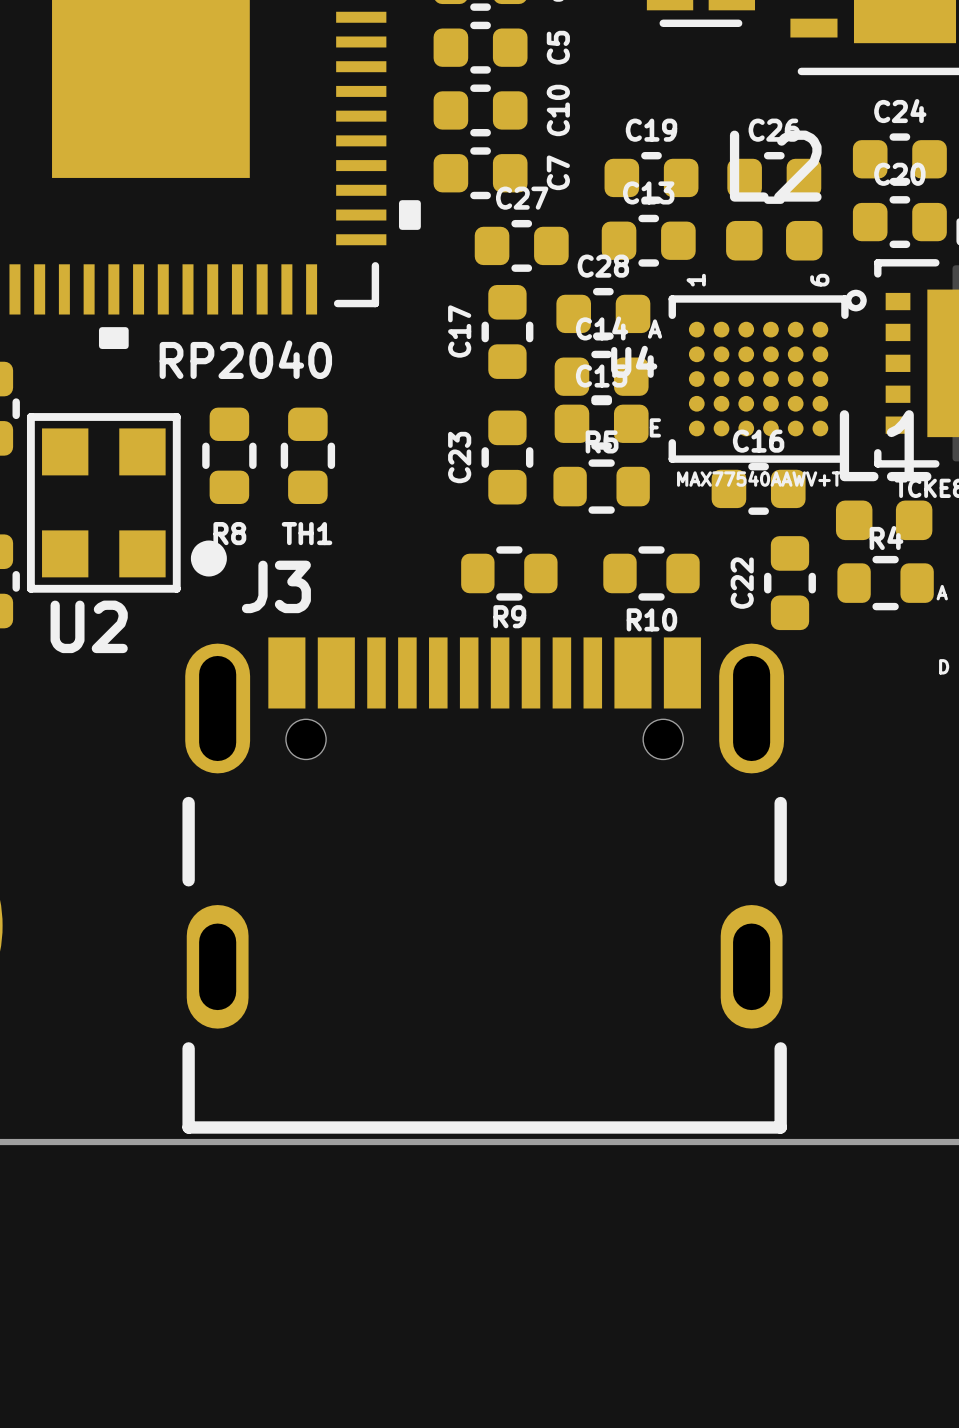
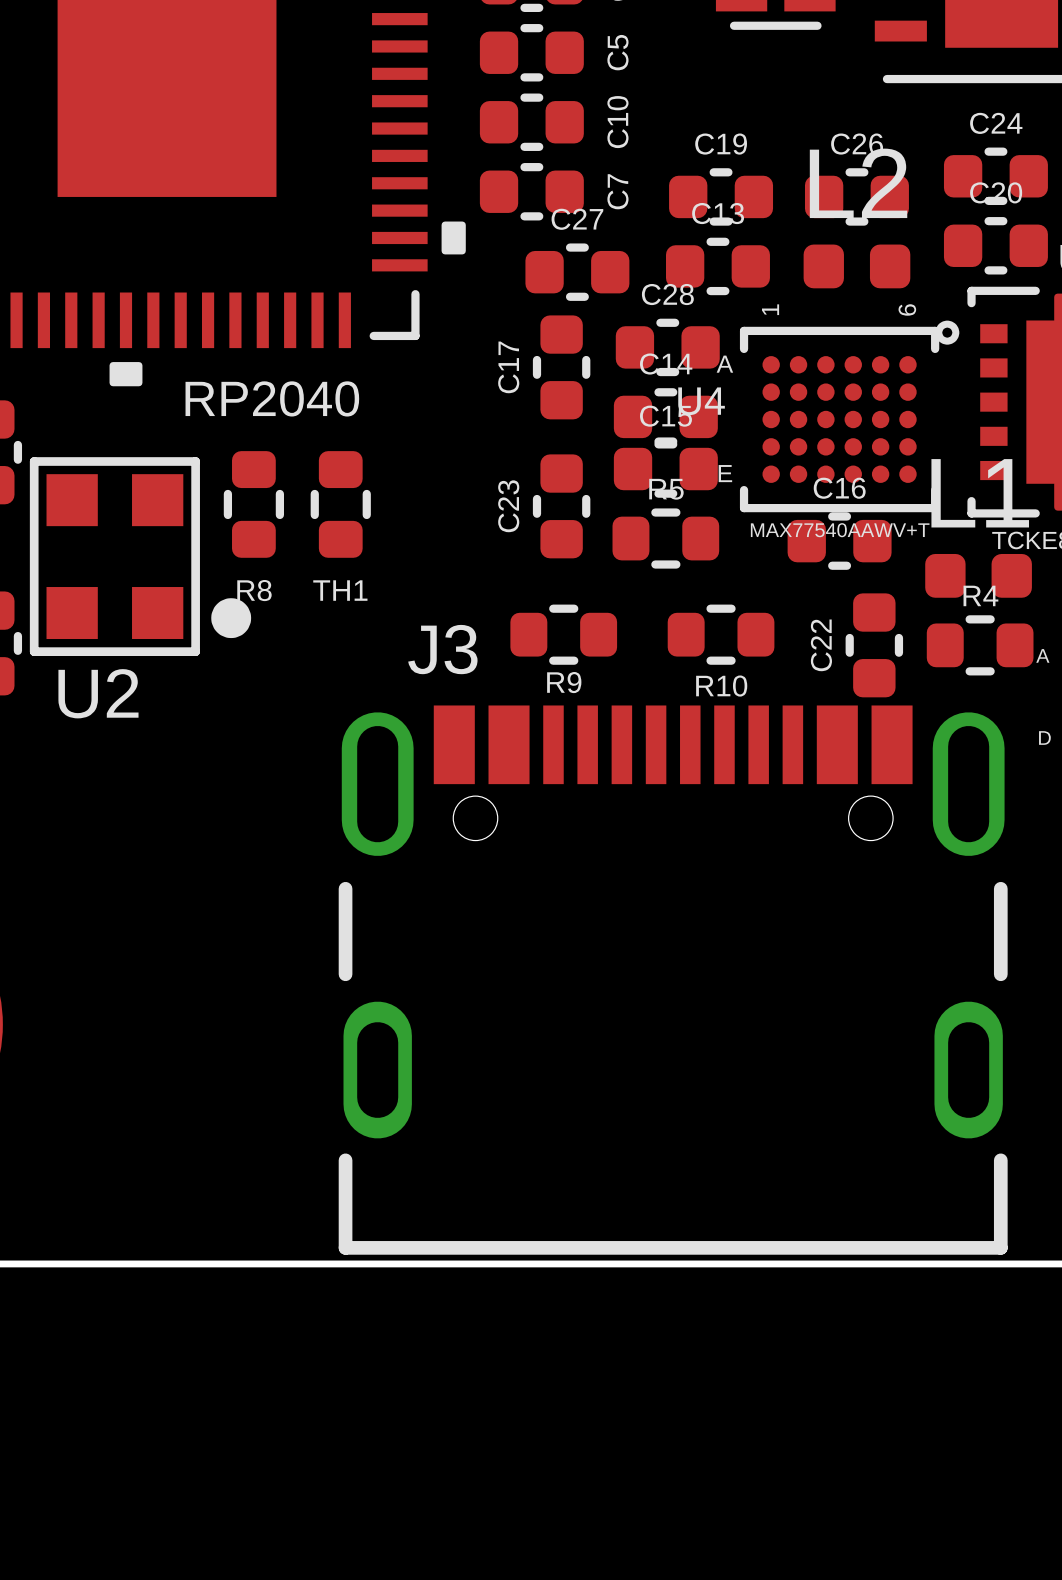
J3 position: (484, 885) -> (673, 980)

